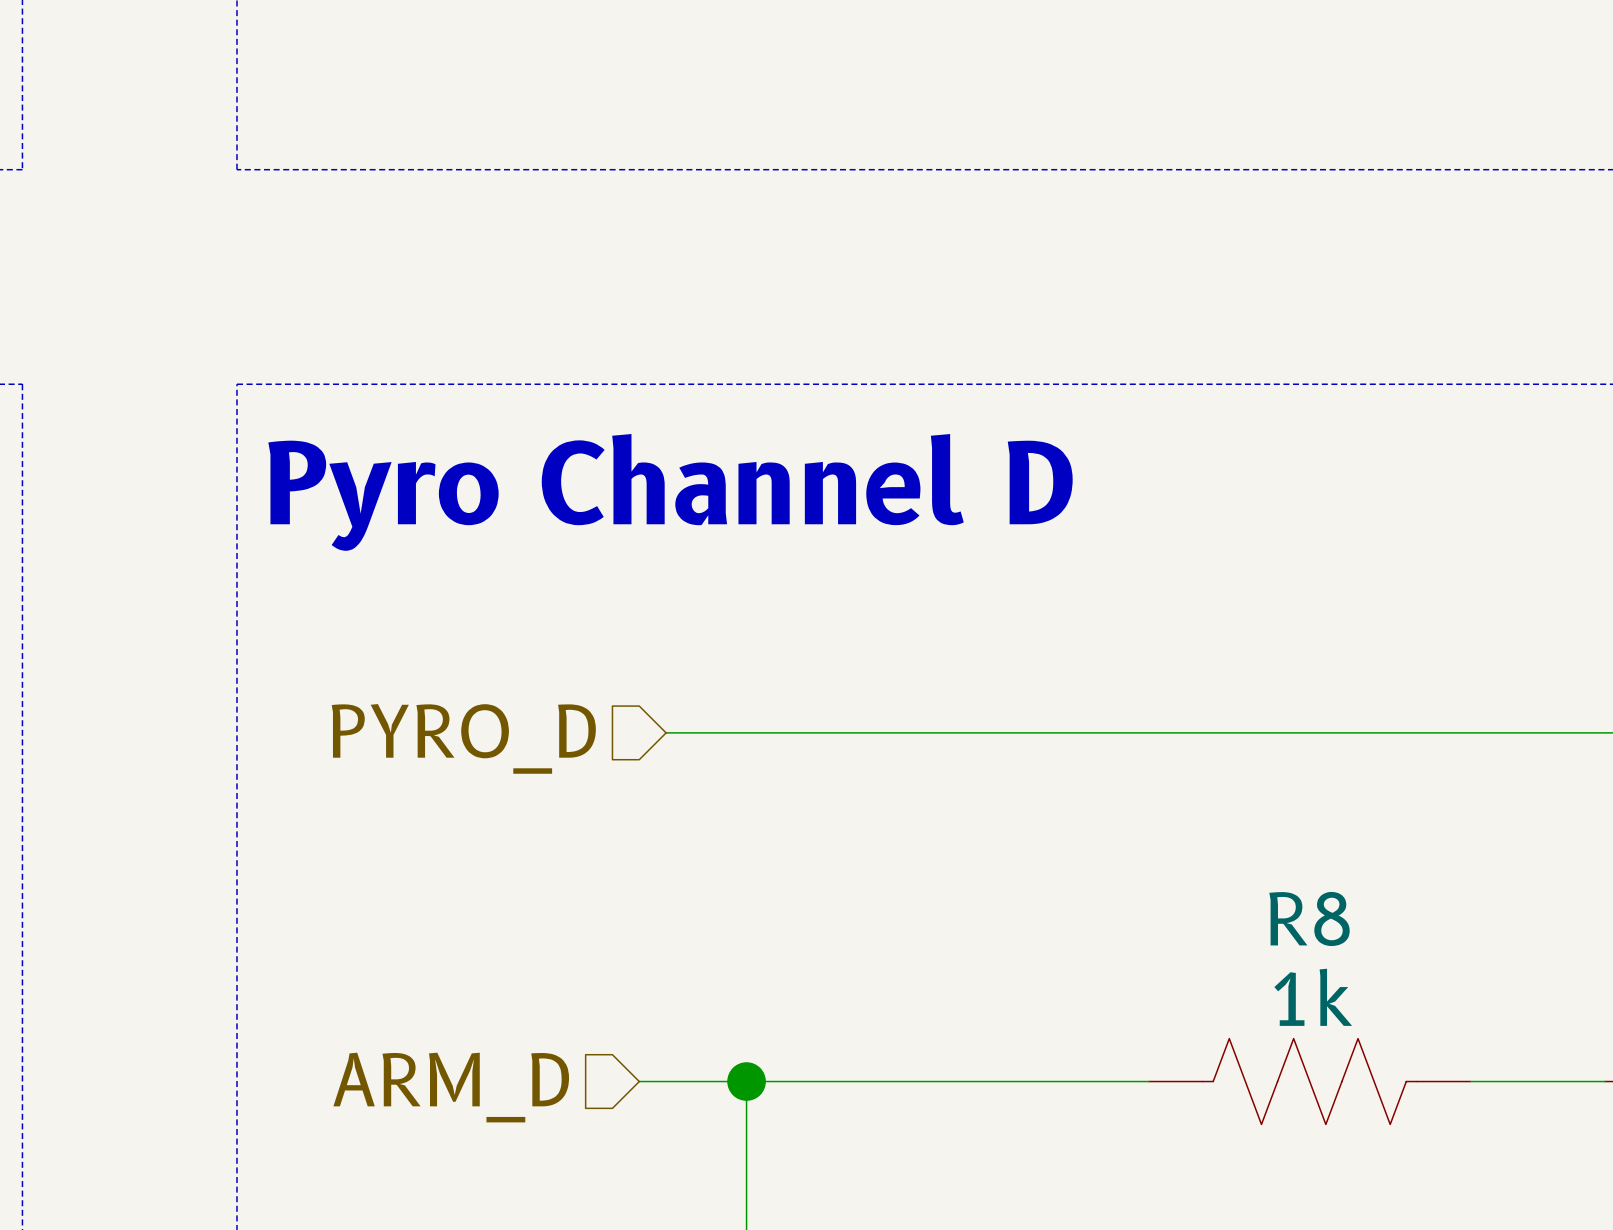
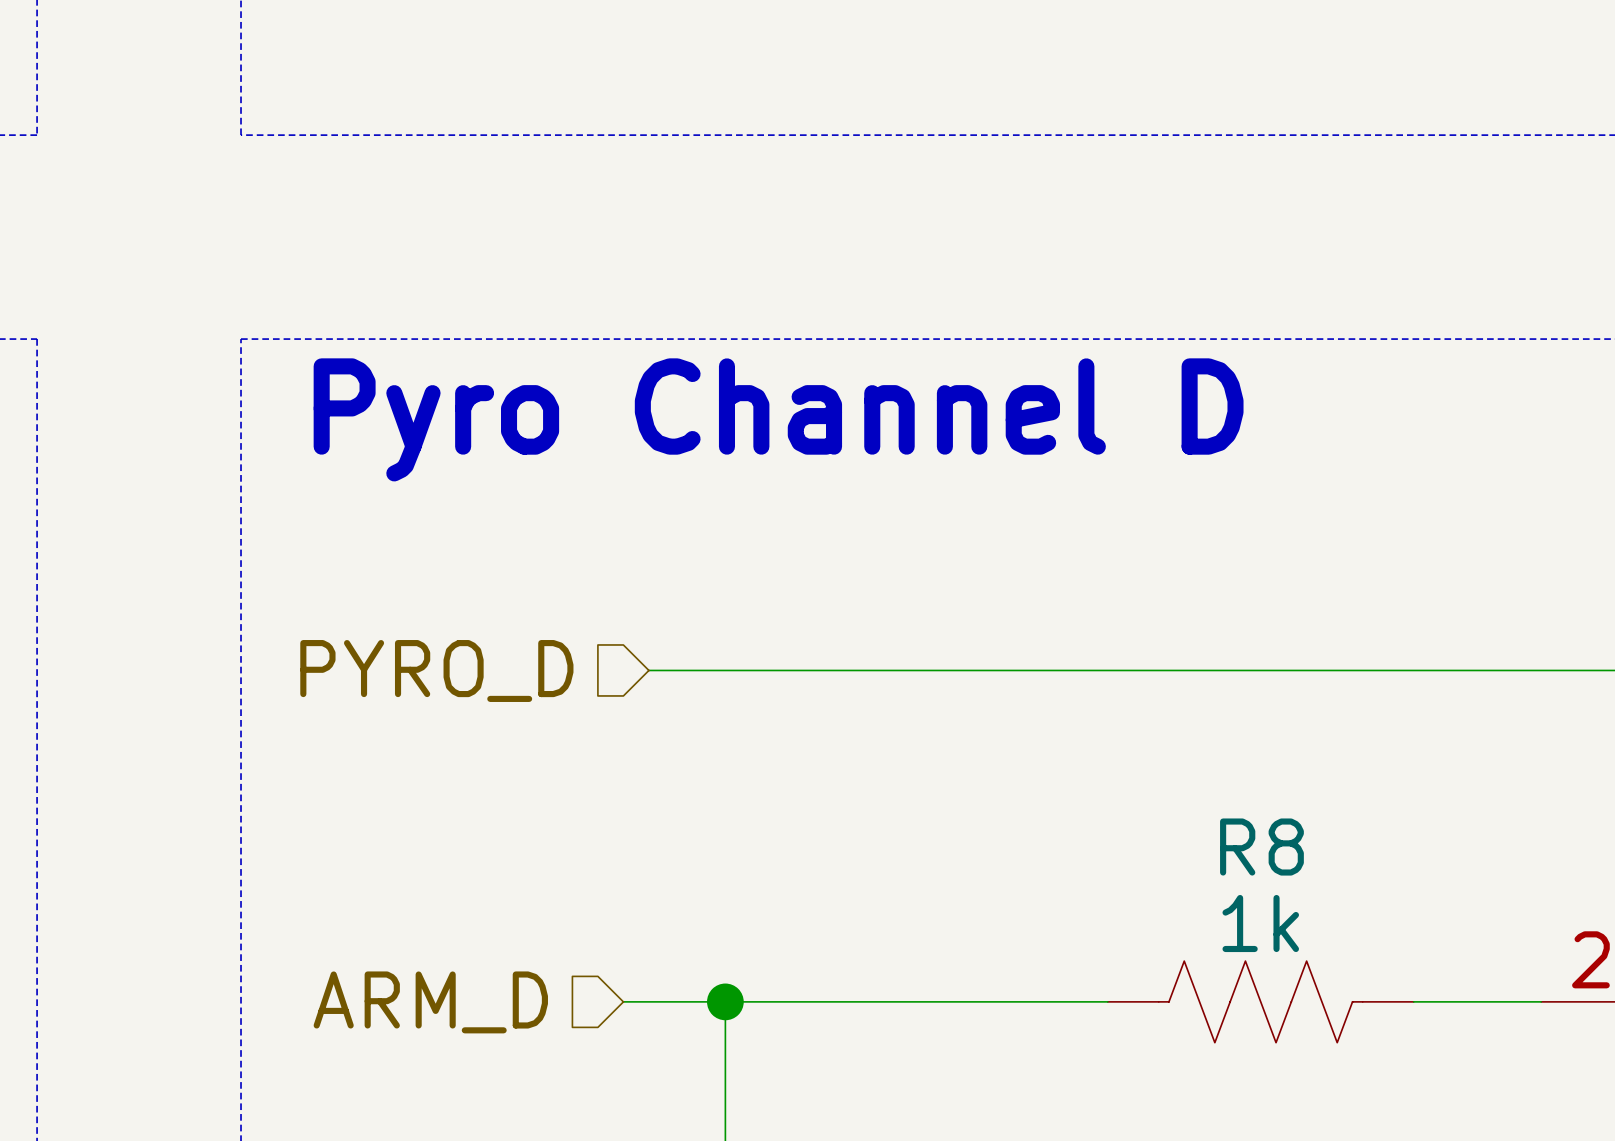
text position: Pyro Channel D (670, 492) -> Pyro Channel D (778, 419)

